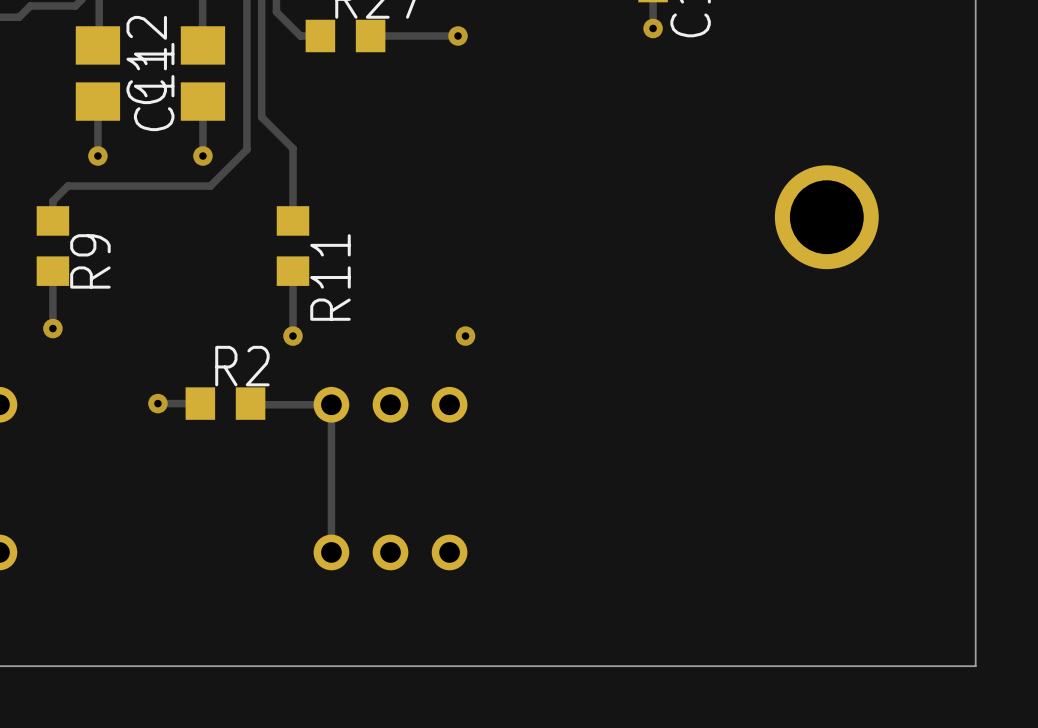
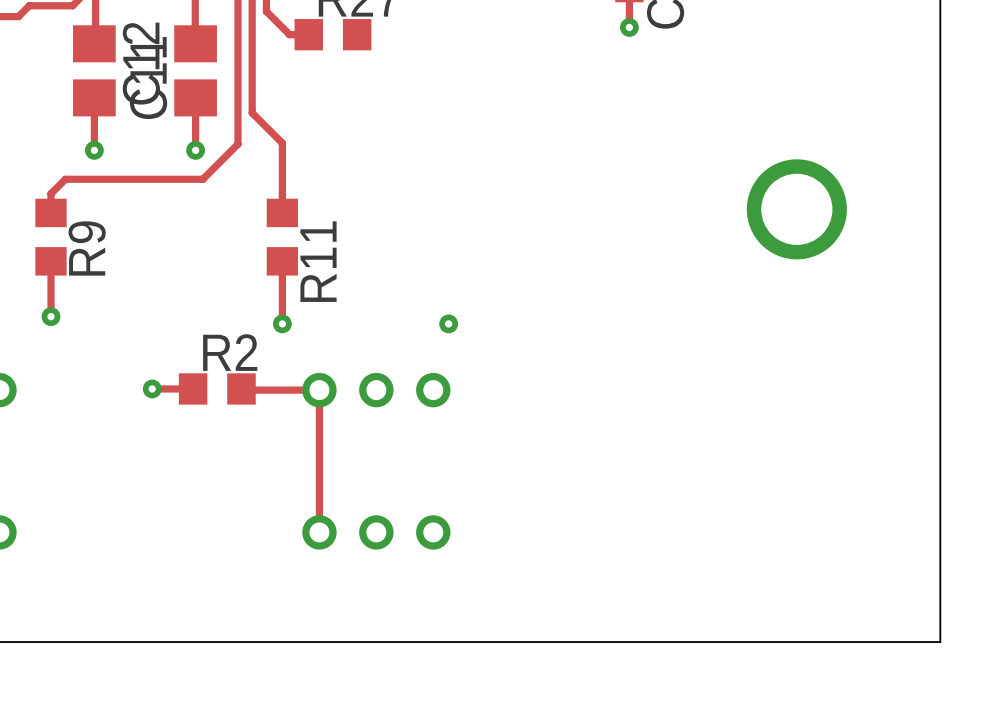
track: (370, 35) (458, 35) -> none
via: (458, 35) -> none

